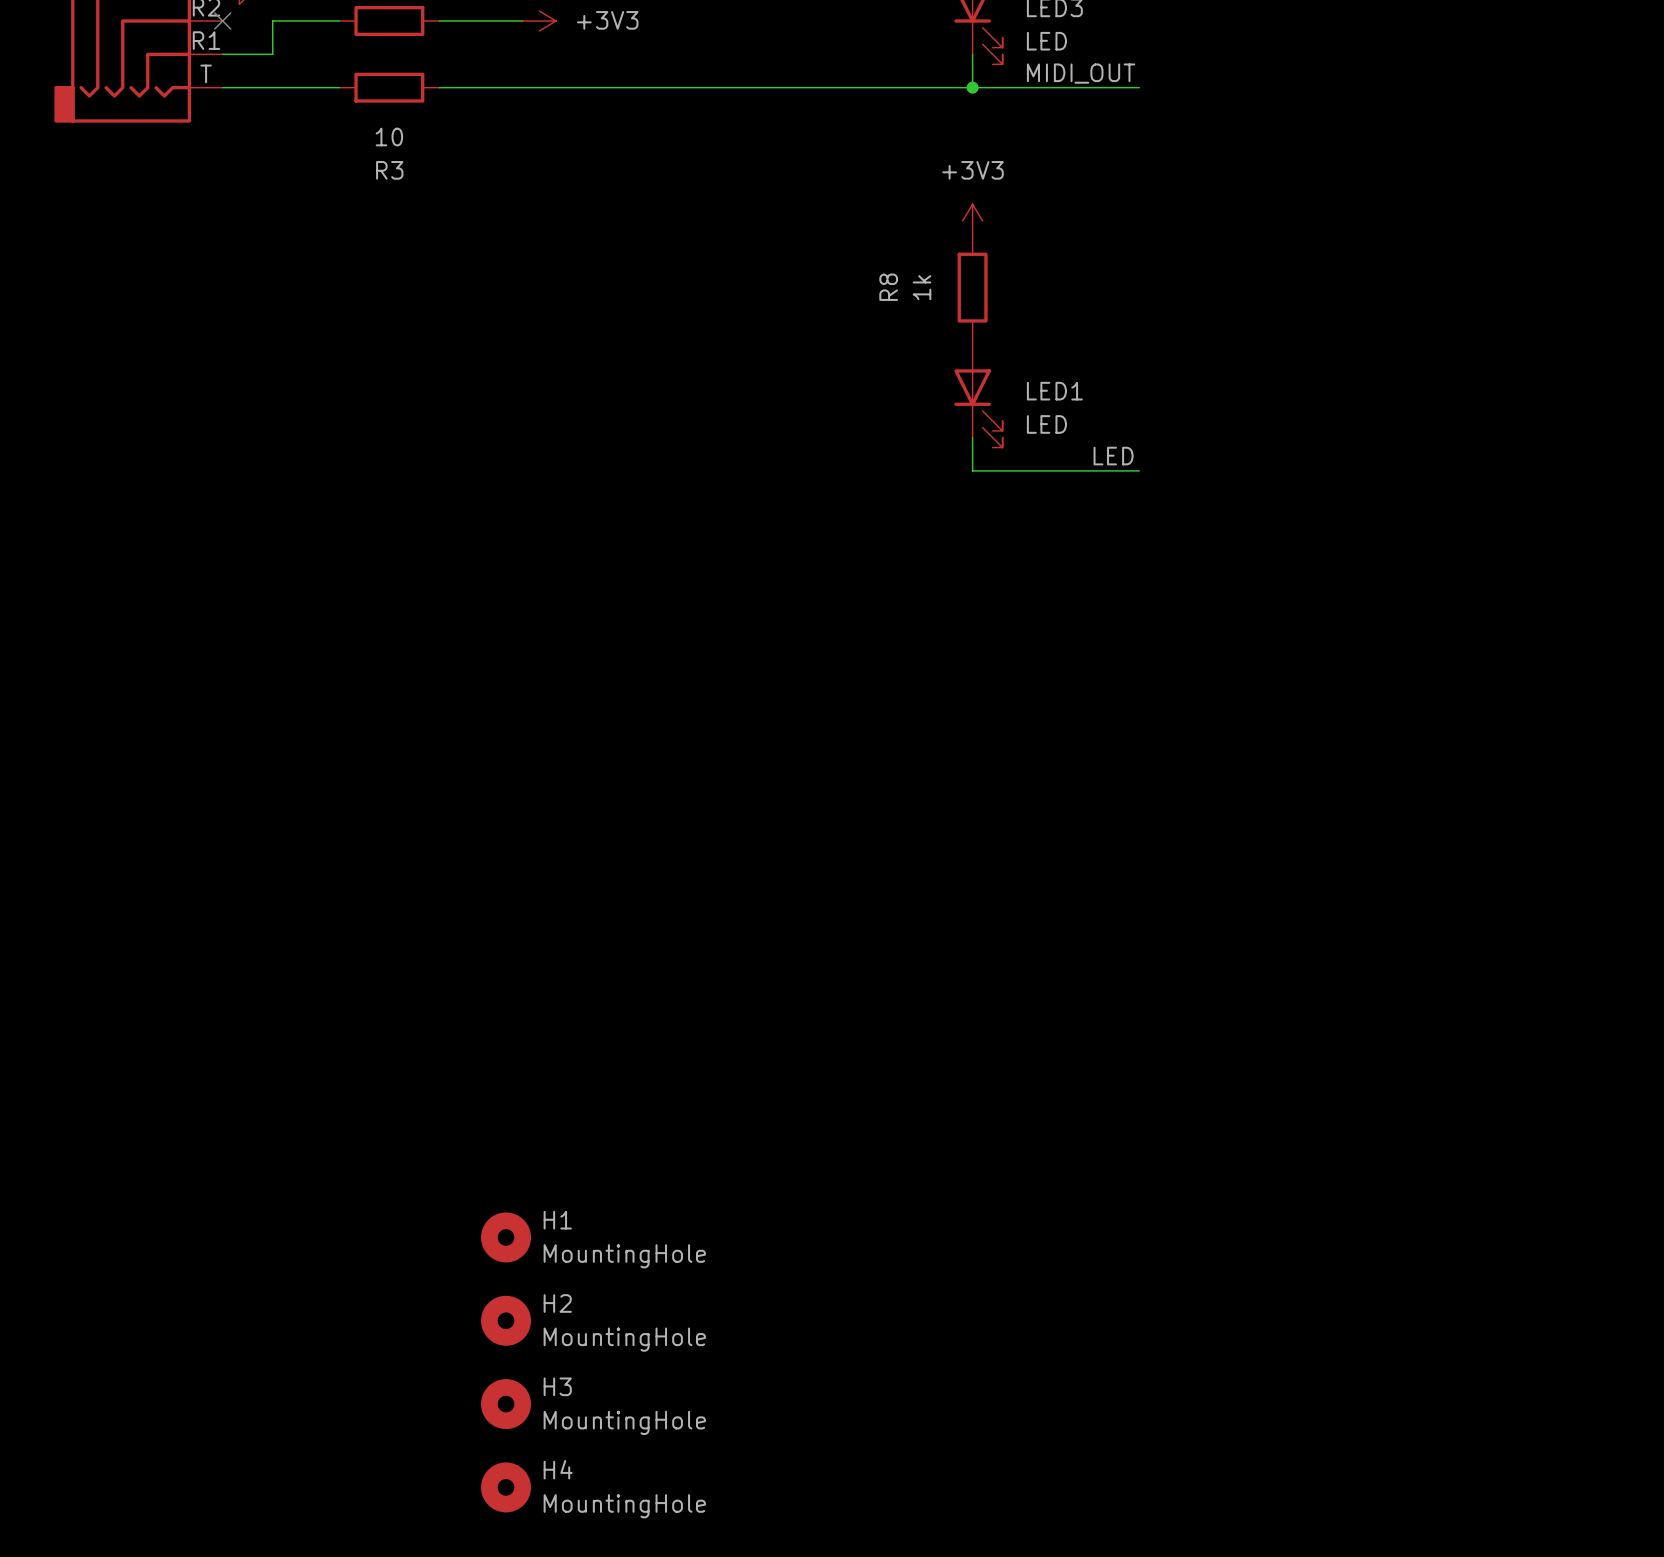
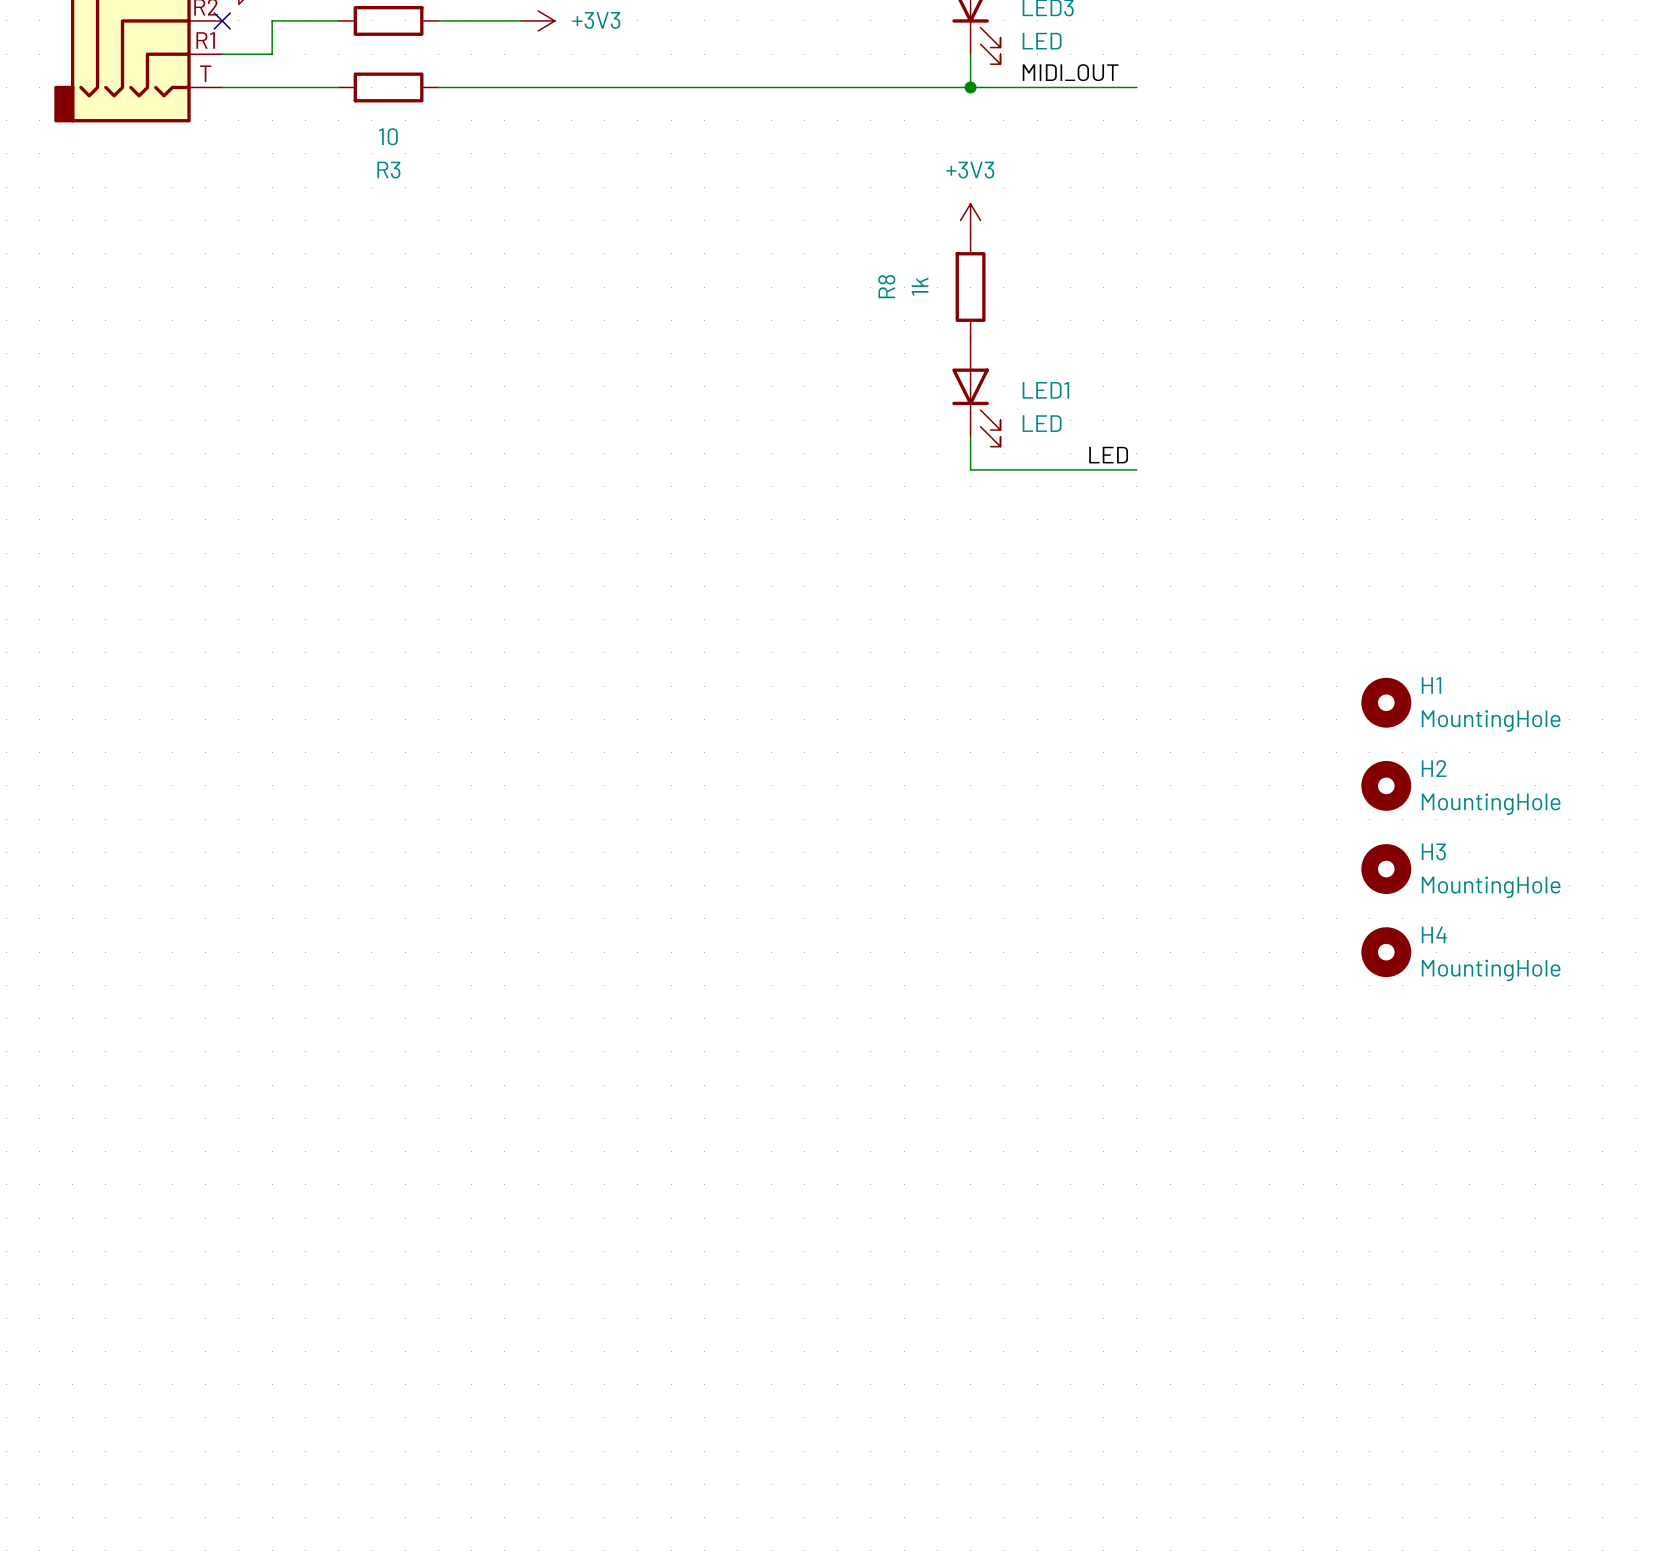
H1 position: (506, 1237) -> (1386, 702)
H2 position: (506, 1320) -> (1386, 785)
H3 position: (506, 1404) -> (1386, 869)
H4 position: (506, 1487) -> (1386, 952)

